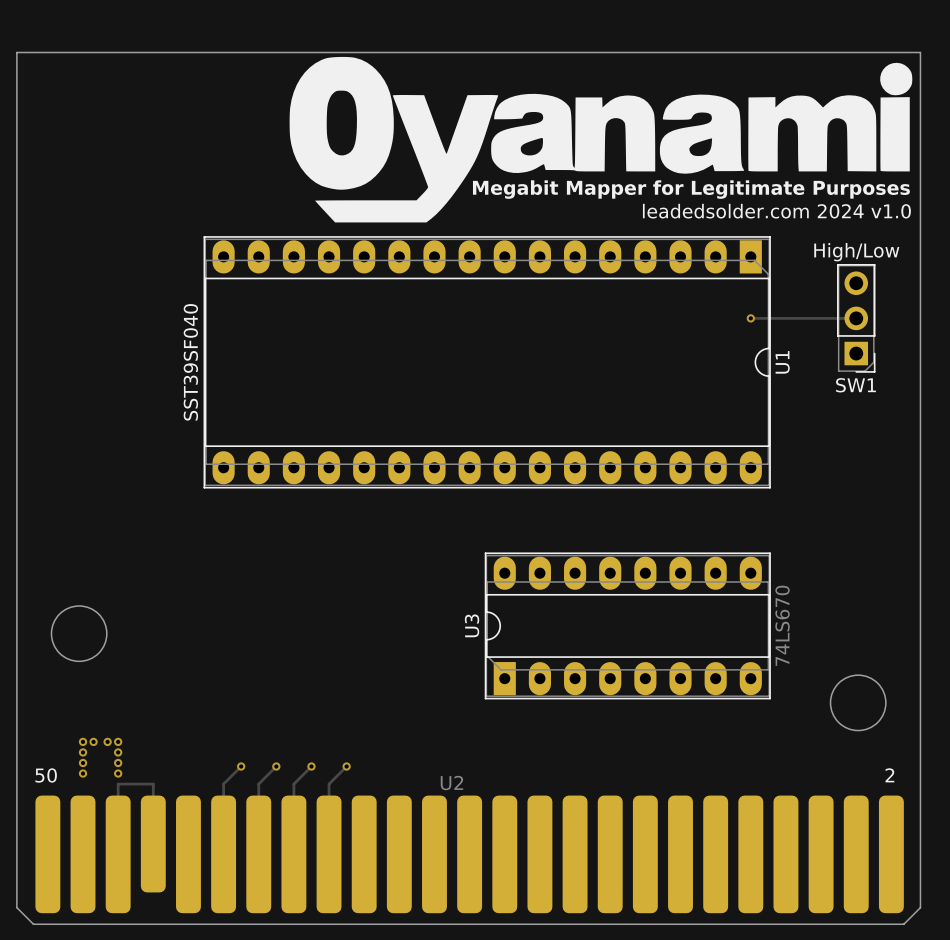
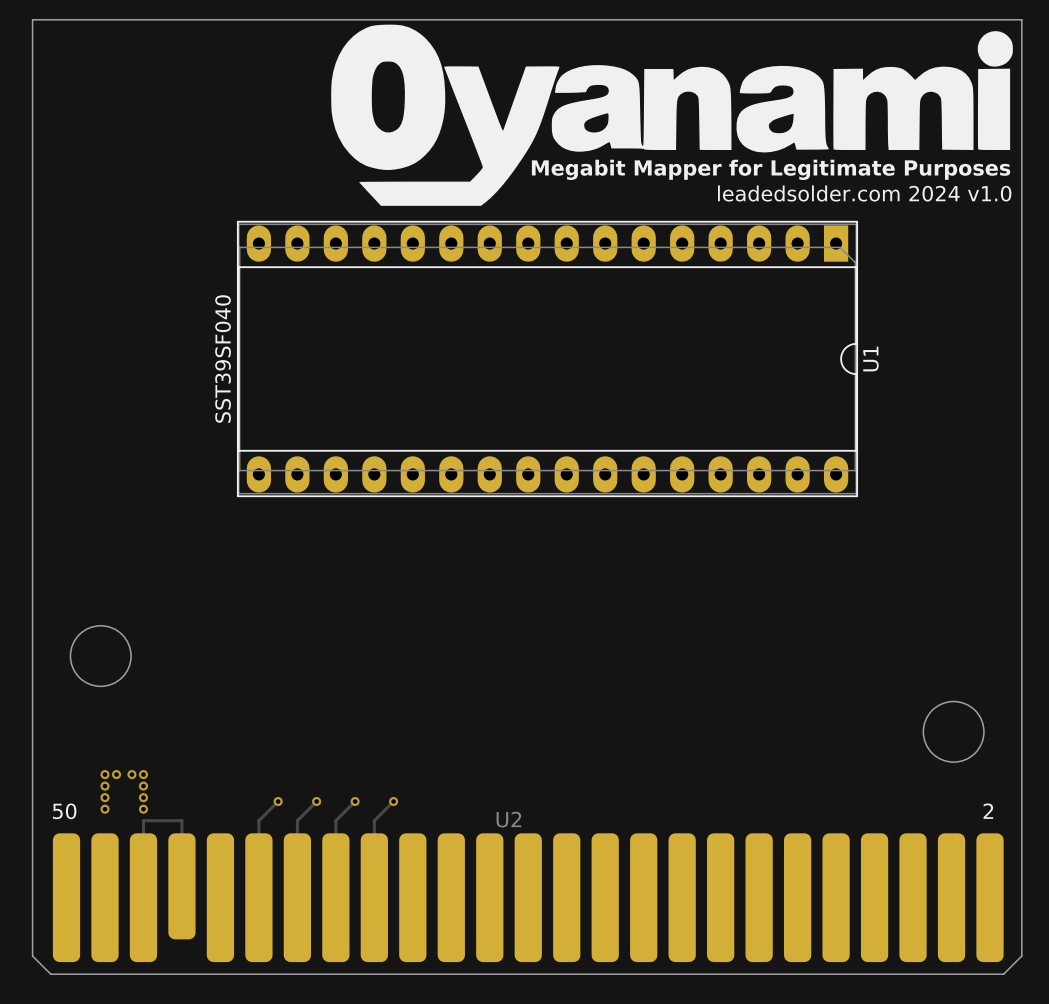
track: (750, 318) (856, 318) -> none
via: (750, 318) -> none
SW1: High/Low (856, 318) -> none
U3: 74LS670 (627, 625) -> none

